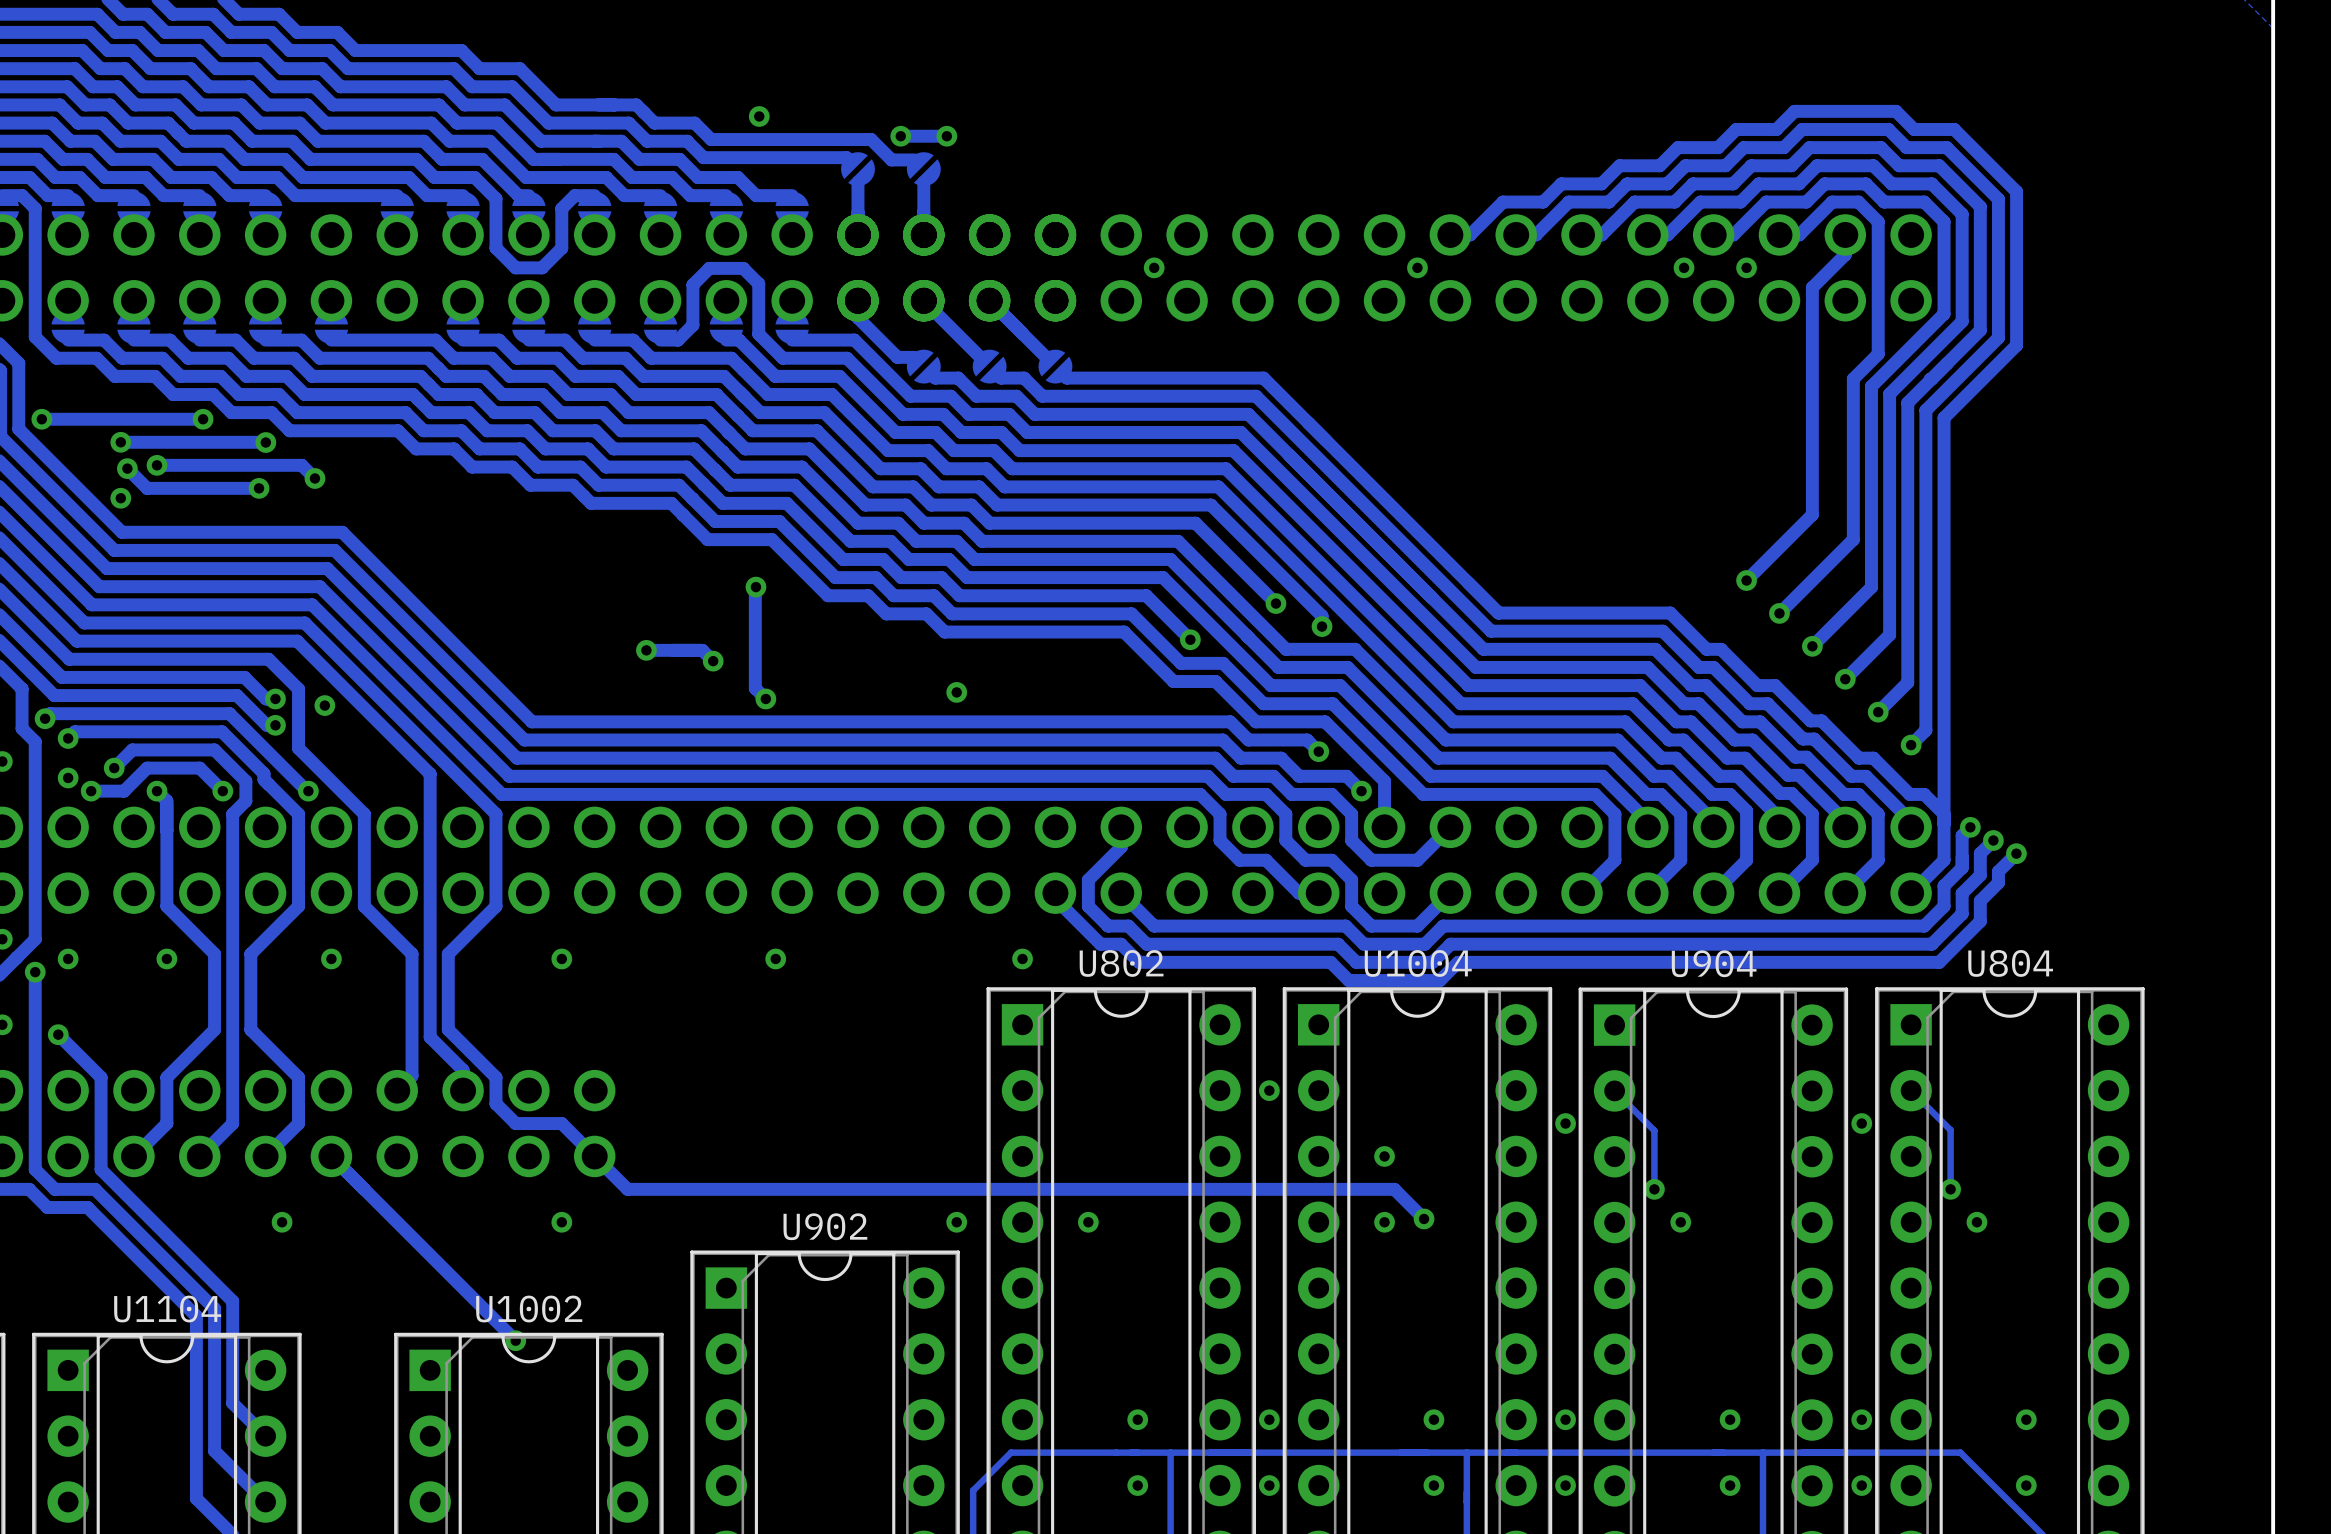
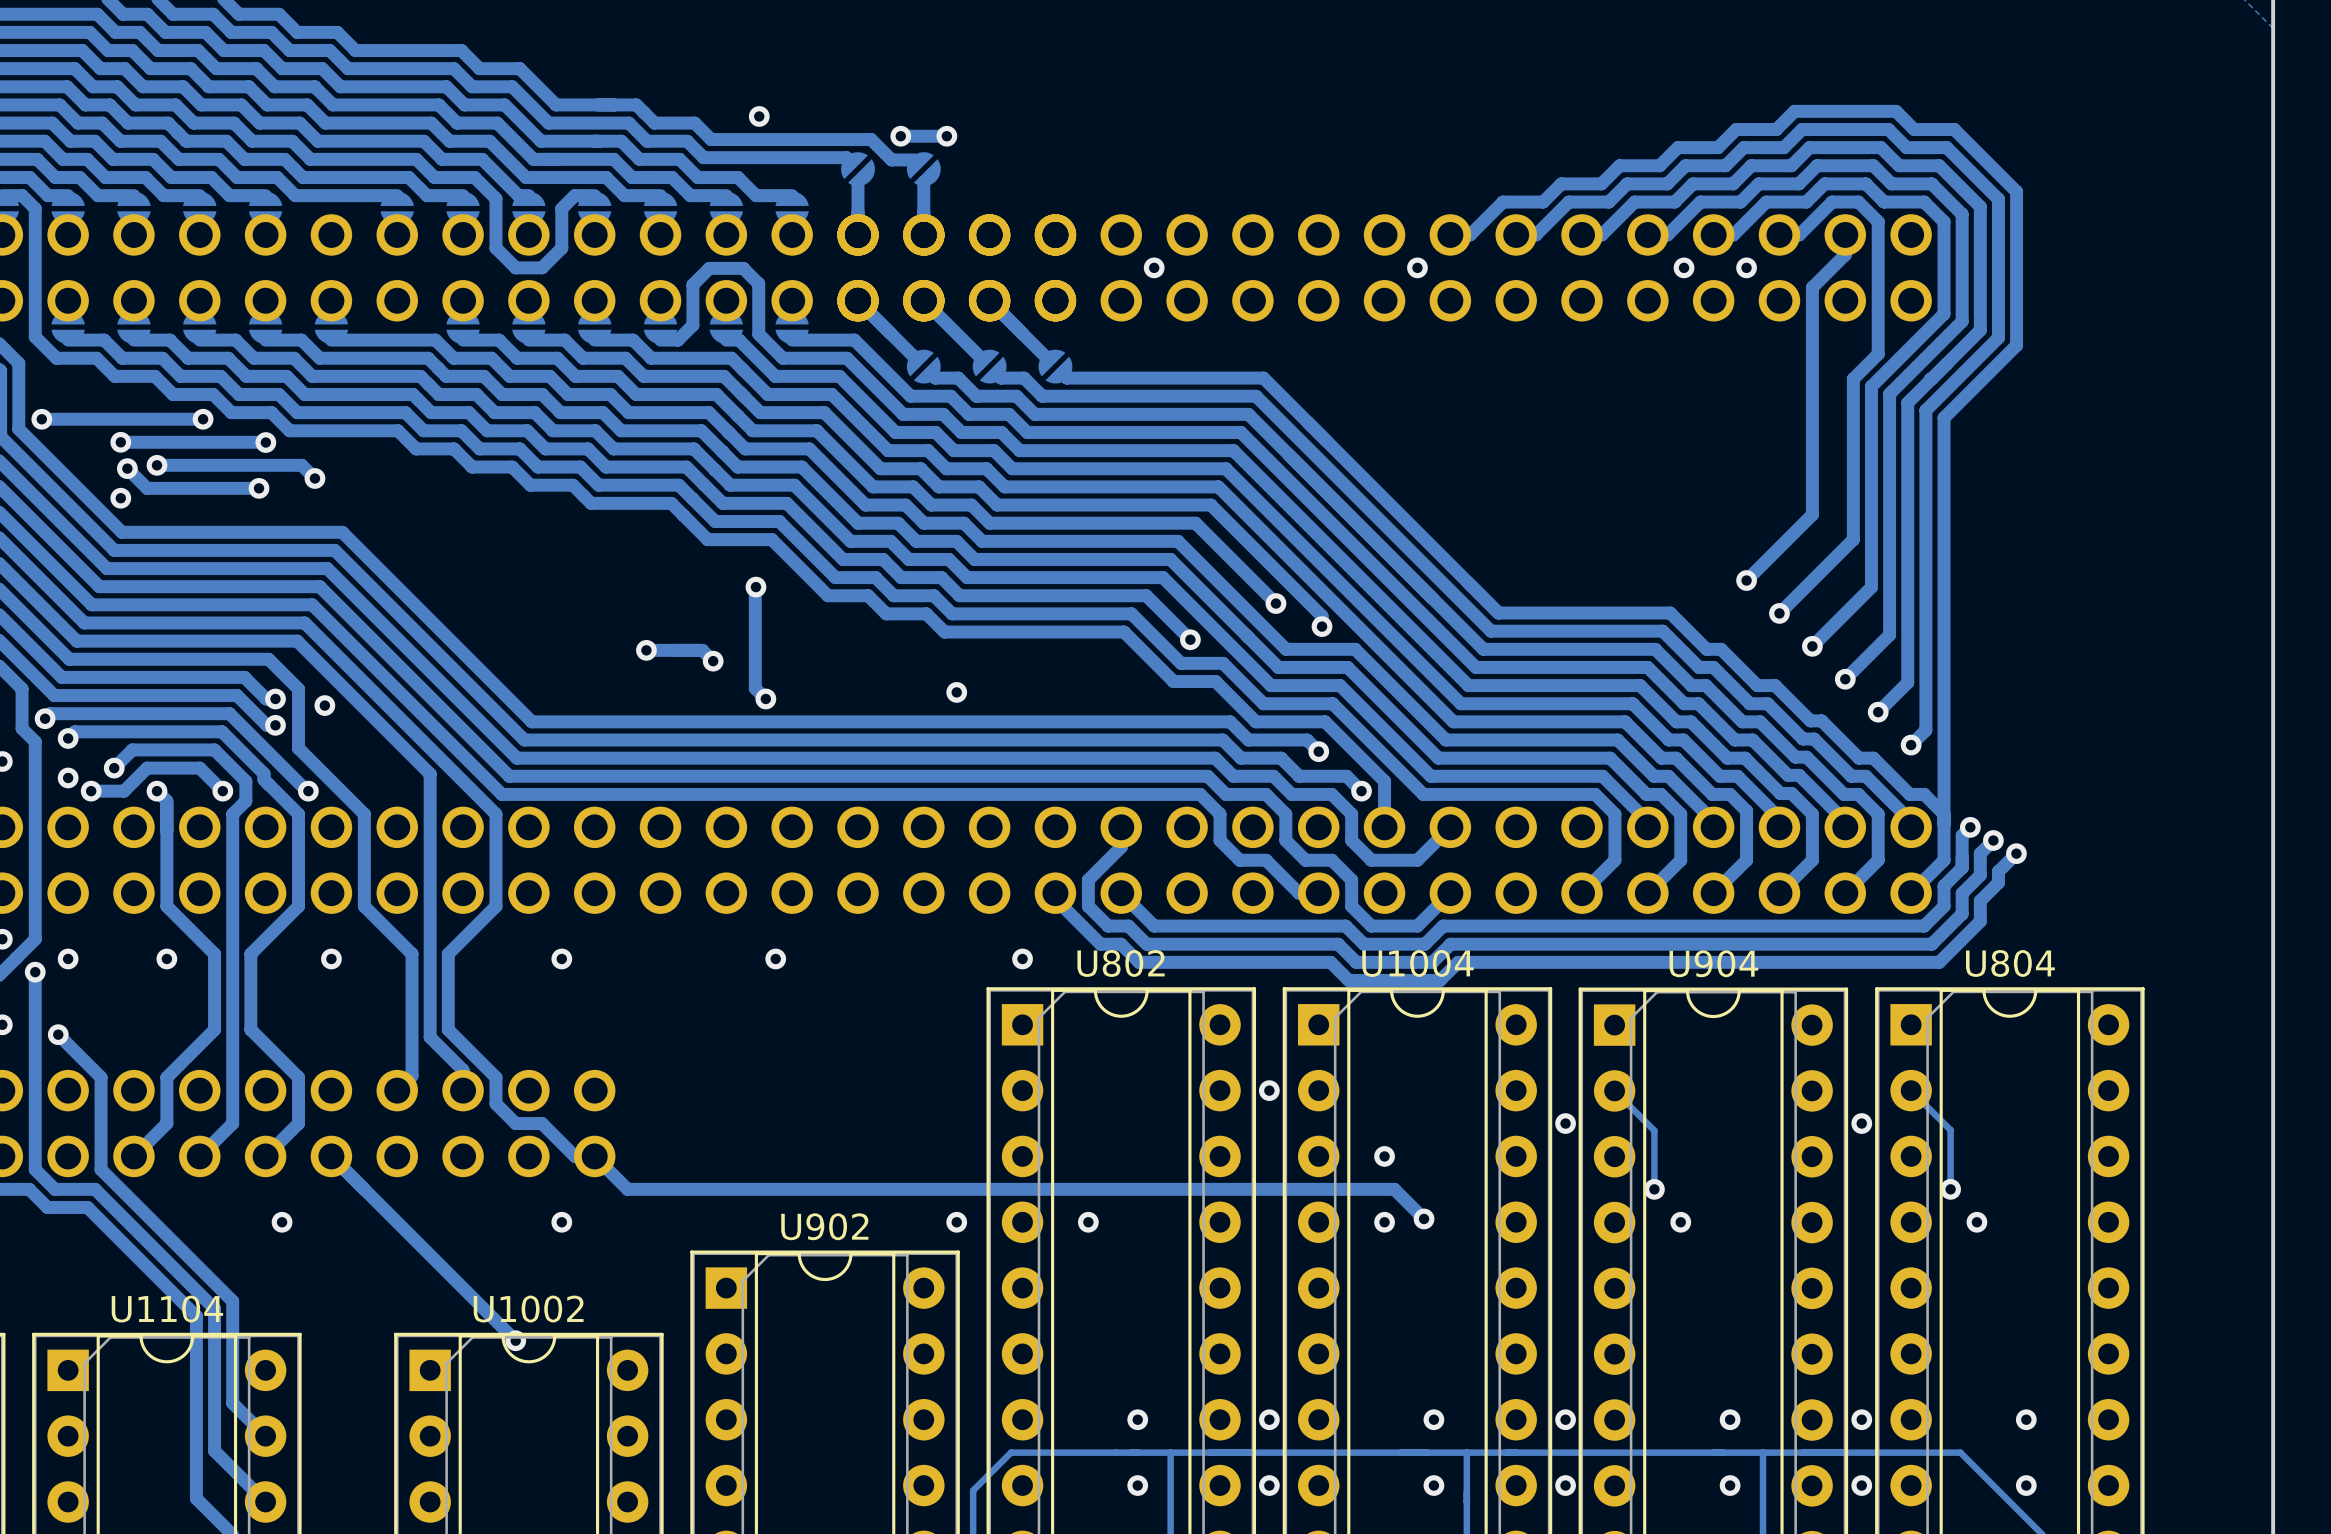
track: (857, 300) (857, 317) (897, 357) (914, 357) -> (857, 300) (914, 357)
track: (542, 1123) (561, 1123) (594, 1156) -> (542, 1123) (574, 1156) (594, 1156)

